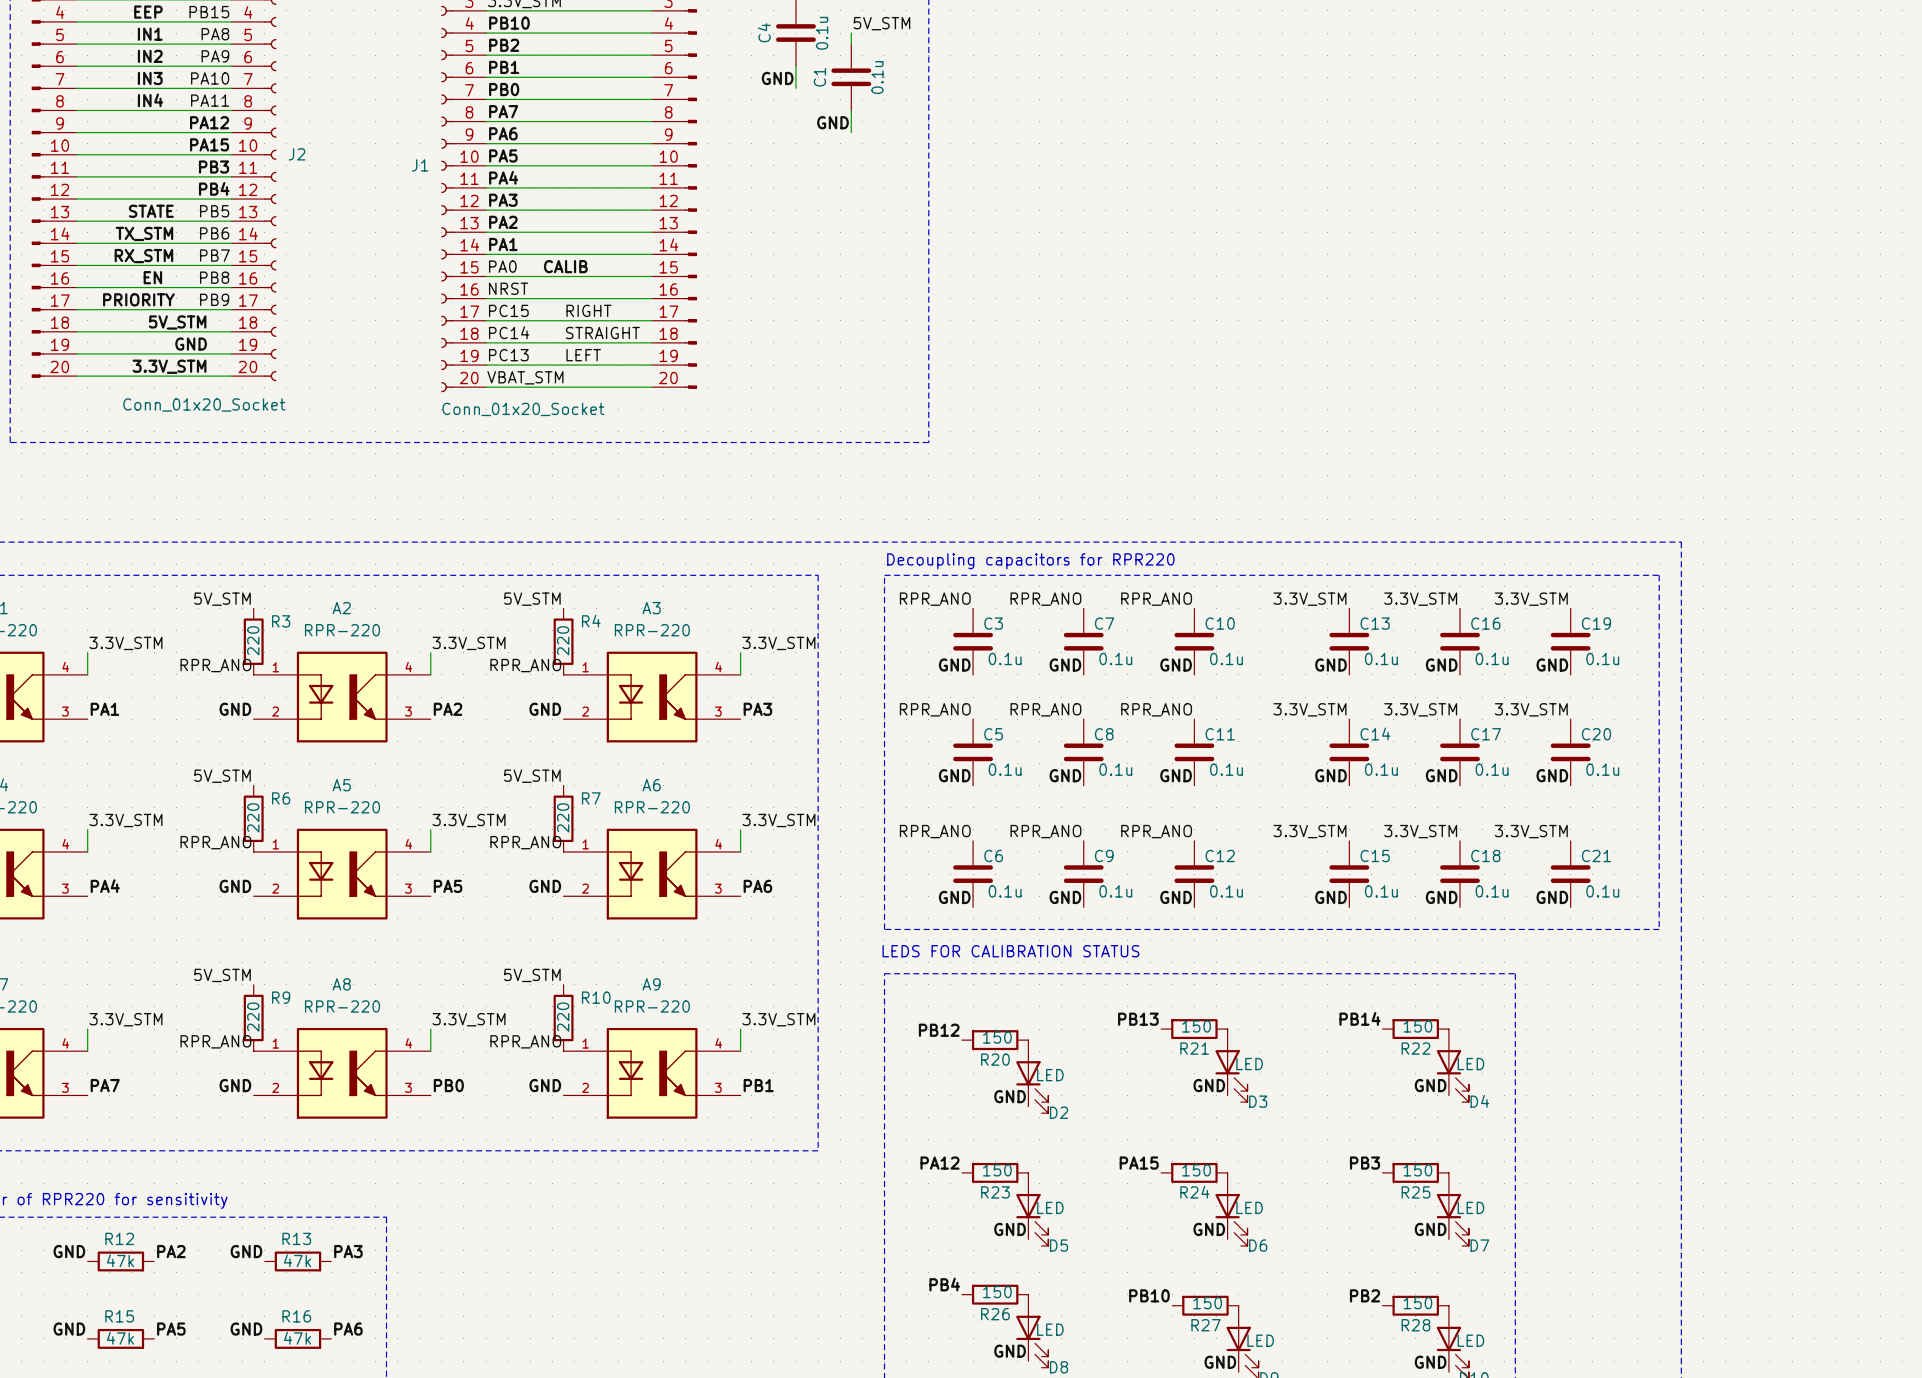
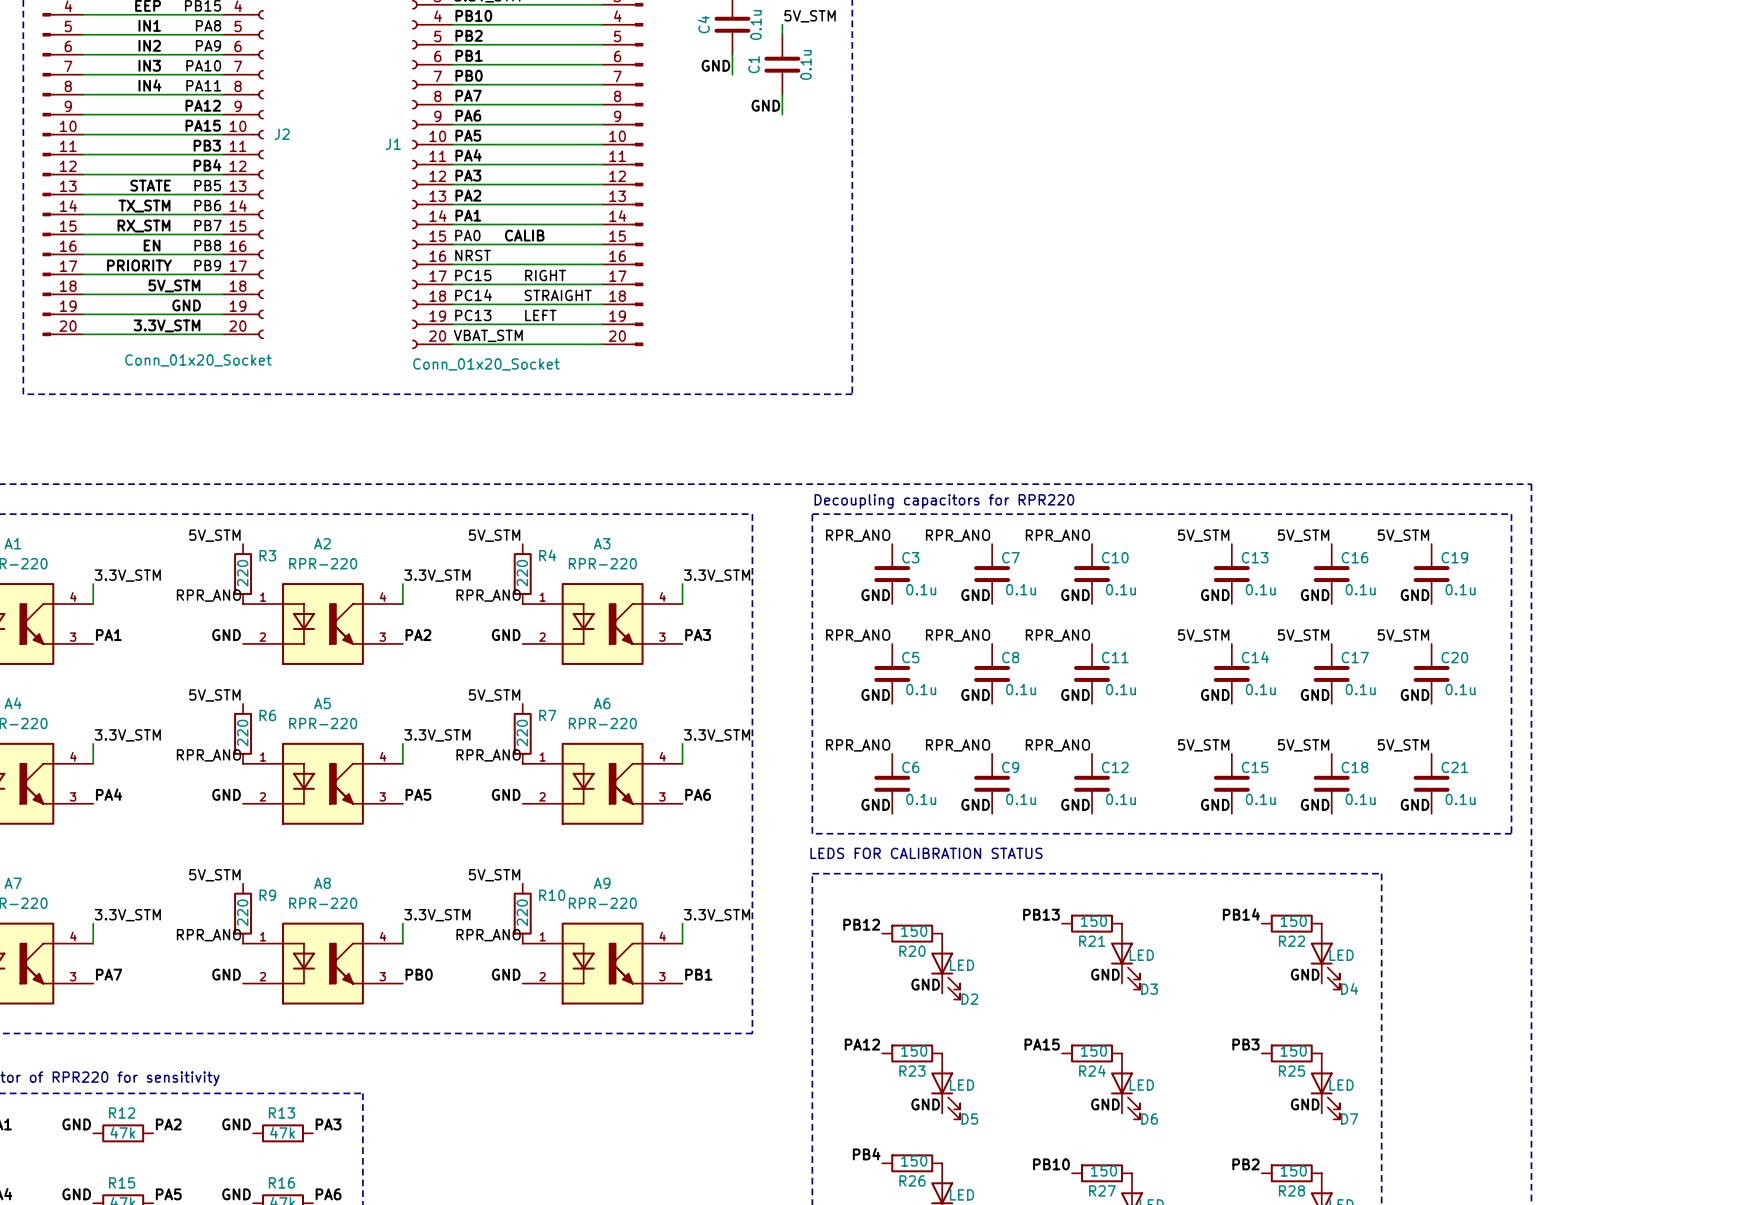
label: 3.3V_STM (1309, 599) -> 5V_STM (1203, 535)
label: 3.3V_STM (1420, 599) -> 5V_STM (1303, 535)
label: 3.3V_STM (1531, 599) -> 5V_STM (1403, 535)
label: 3.3V_STM (1309, 709) -> 5V_STM (1203, 635)
label: 3.3V_STM (1420, 709) -> 5V_STM (1303, 635)
label: 3.3V_STM (1531, 709) -> 5V_STM (1403, 635)
label: 3.3V_STM (1309, 831) -> 5V_STM (1203, 745)
label: 3.3V_STM (1420, 831) -> 5V_STM (1303, 745)
label: 3.3V_STM (1531, 831) -> 5V_STM (1403, 745)

